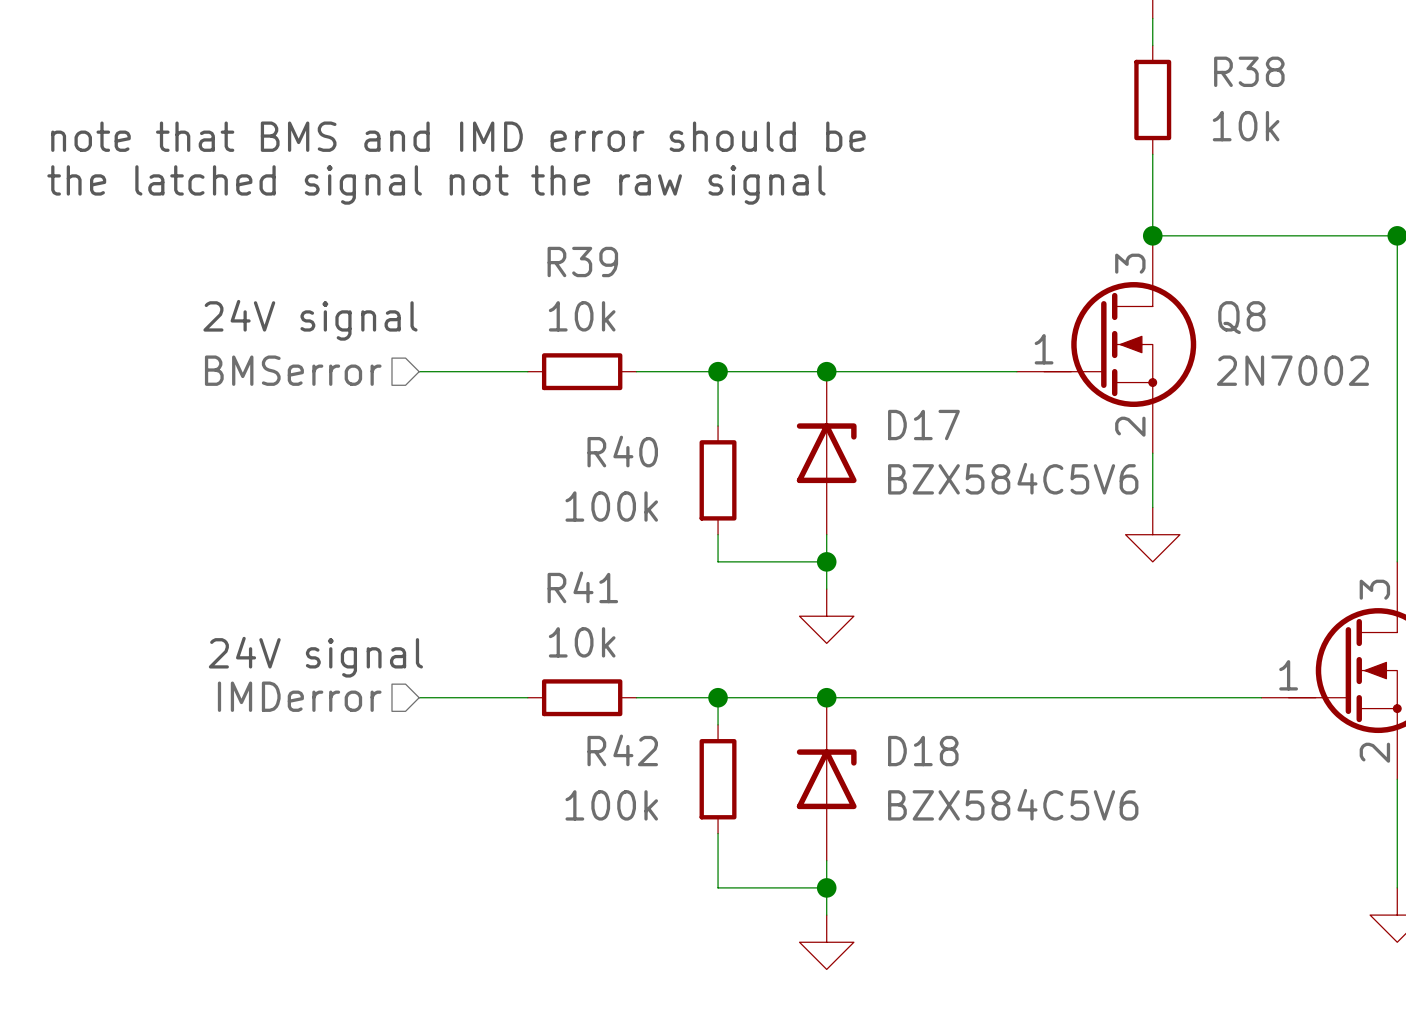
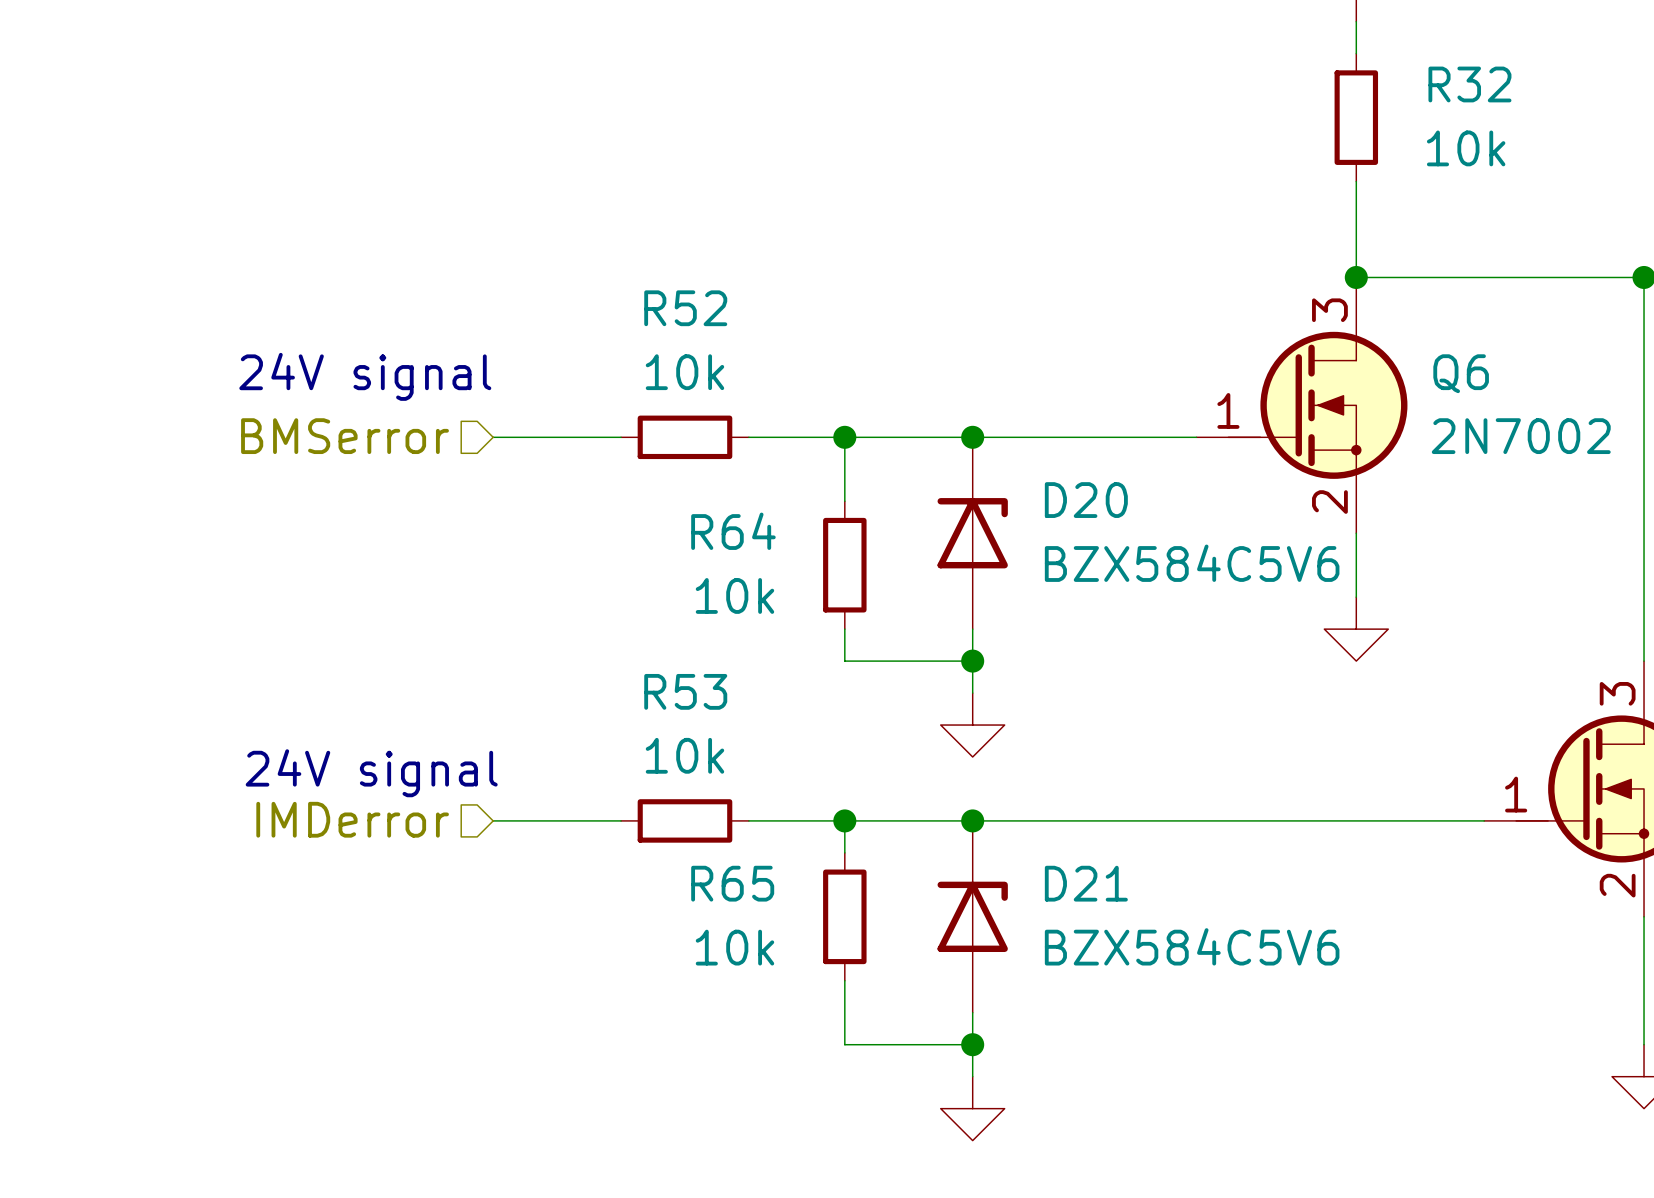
R38 name: R38 (1249, 71) -> R32 (1469, 84)
text: note that BMS and IMD error should be (458, 136) -> none
text: the latched signal not the raw signal (436, 184) -> none
R39 name: R39 (582, 261) -> R52 (685, 308)
Q8 name: Q8 (1241, 317) -> Q6 (1461, 373)
D17 name: D17 (923, 425) -> D20 (1086, 500)
R40 name: R40 (622, 451) -> R64 (733, 531)
R40 value: 100k (611, 506) -> 10k (734, 595)
R41 name: R41 (582, 587) -> R53 (685, 691)
R42 name: R42 (622, 750) -> R65 (732, 883)
D18 name: D18 (923, 751) -> D21 (1086, 883)
R42 value: 100k (611, 805) -> 10k (734, 947)

